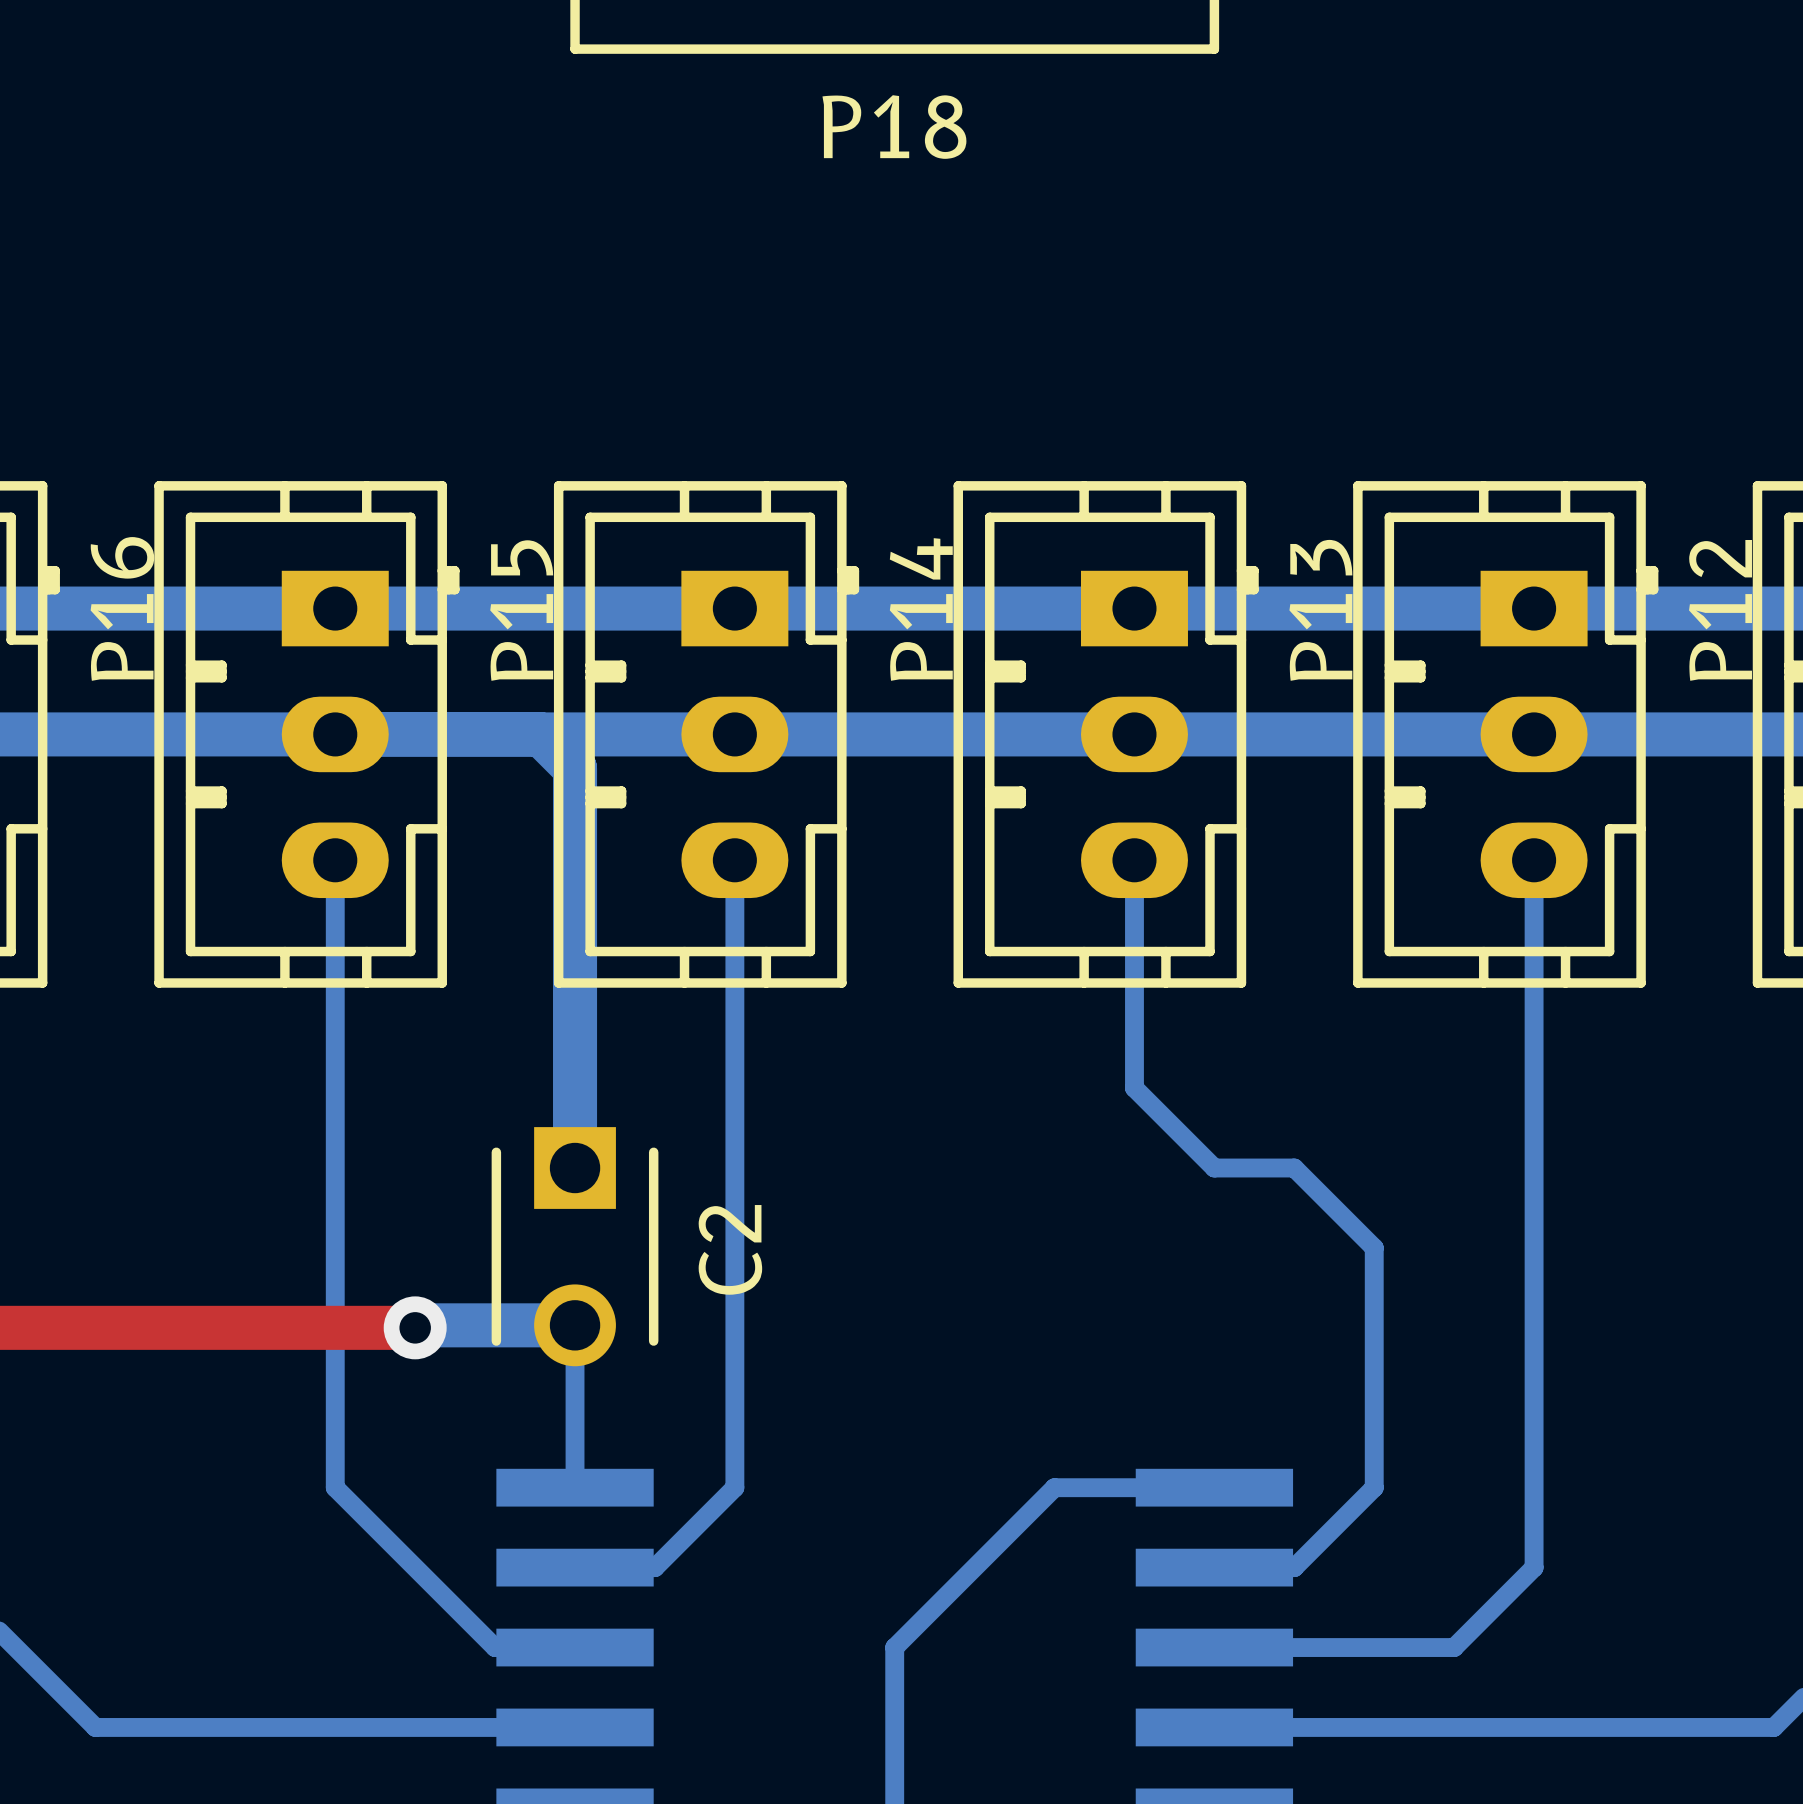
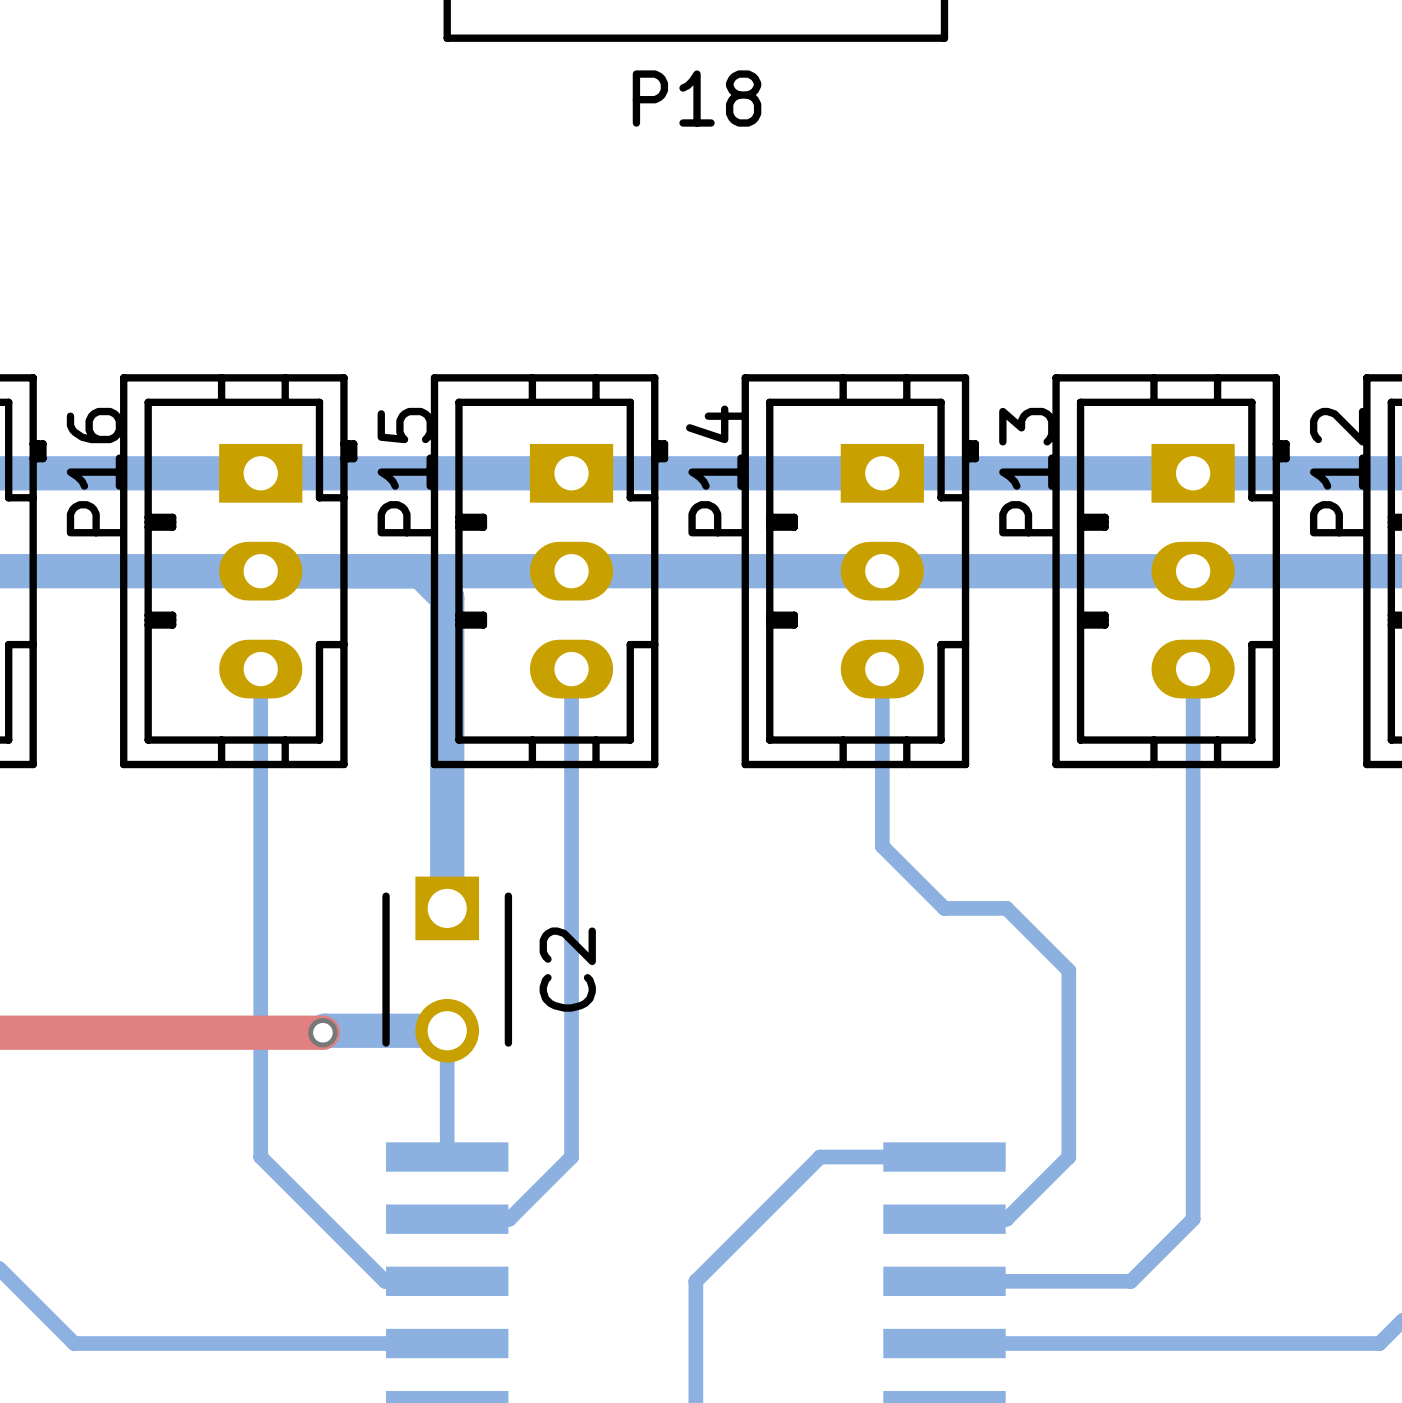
via size: [383, 1296, 447, 1360] -> [308, 1018, 338, 1048]

